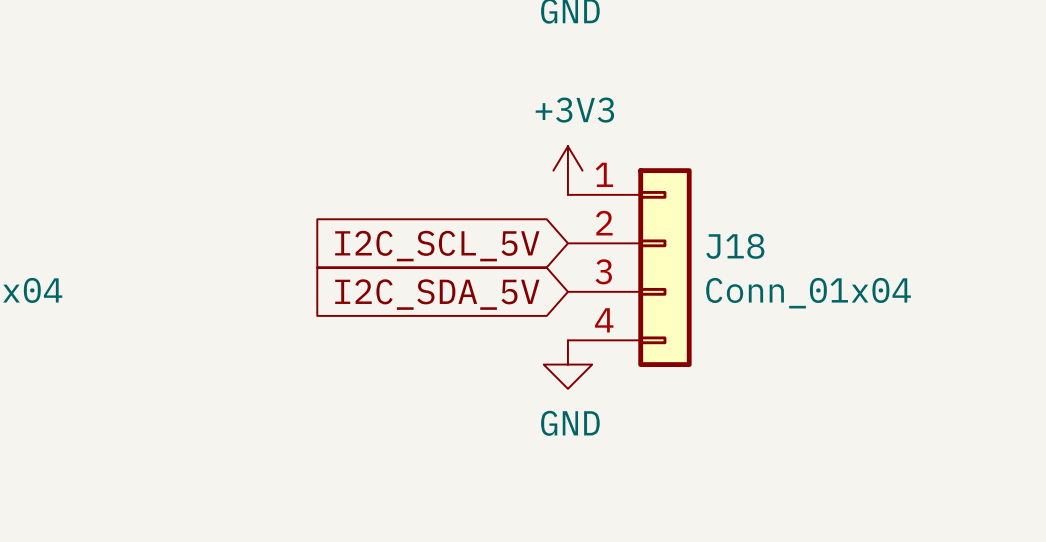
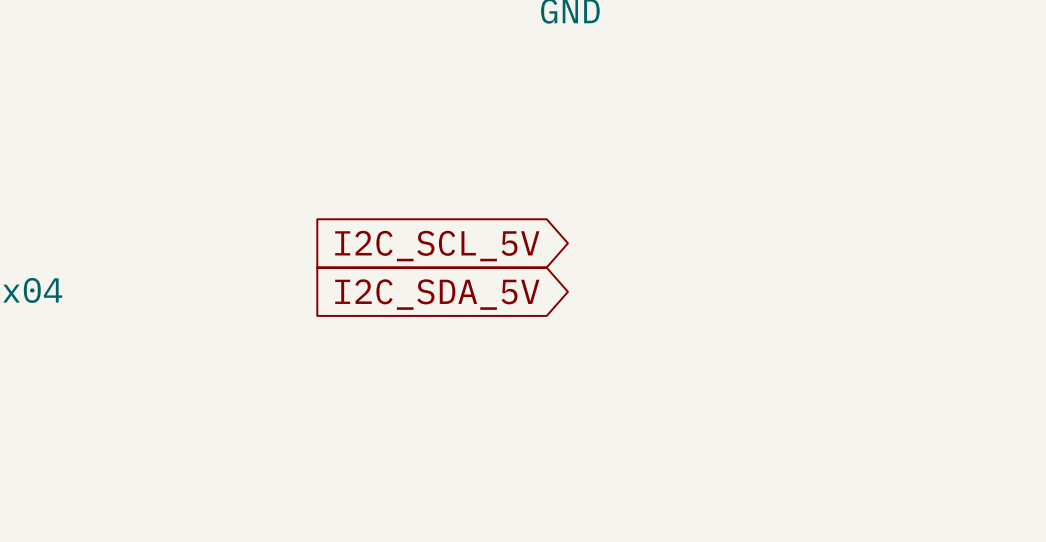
power symbol: +3V3 (567, 170) -> none
J18: Conn_01x04 (629, 267) -> none
power symbol: GND (567, 364) -> none

